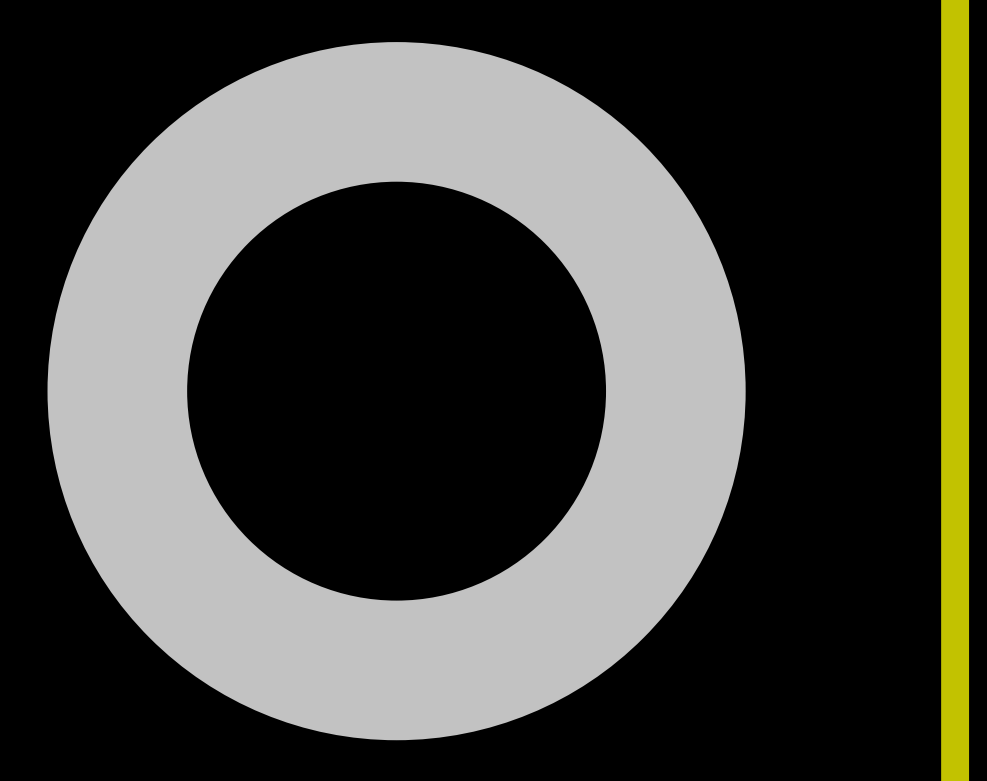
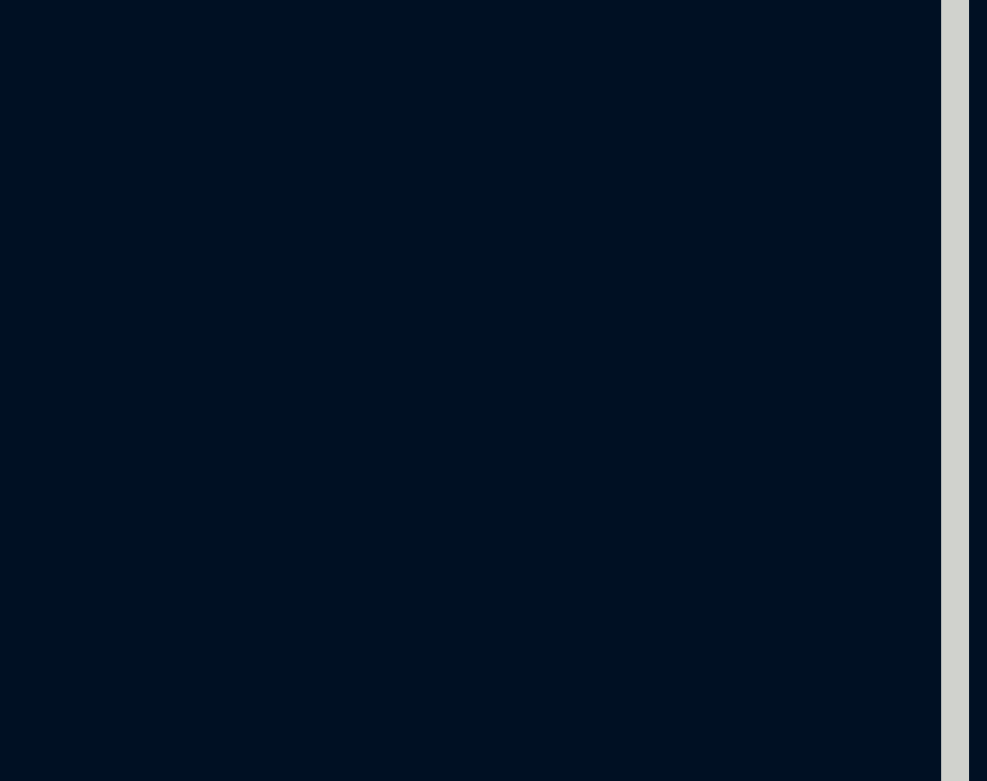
via: (396, 391) -> none

